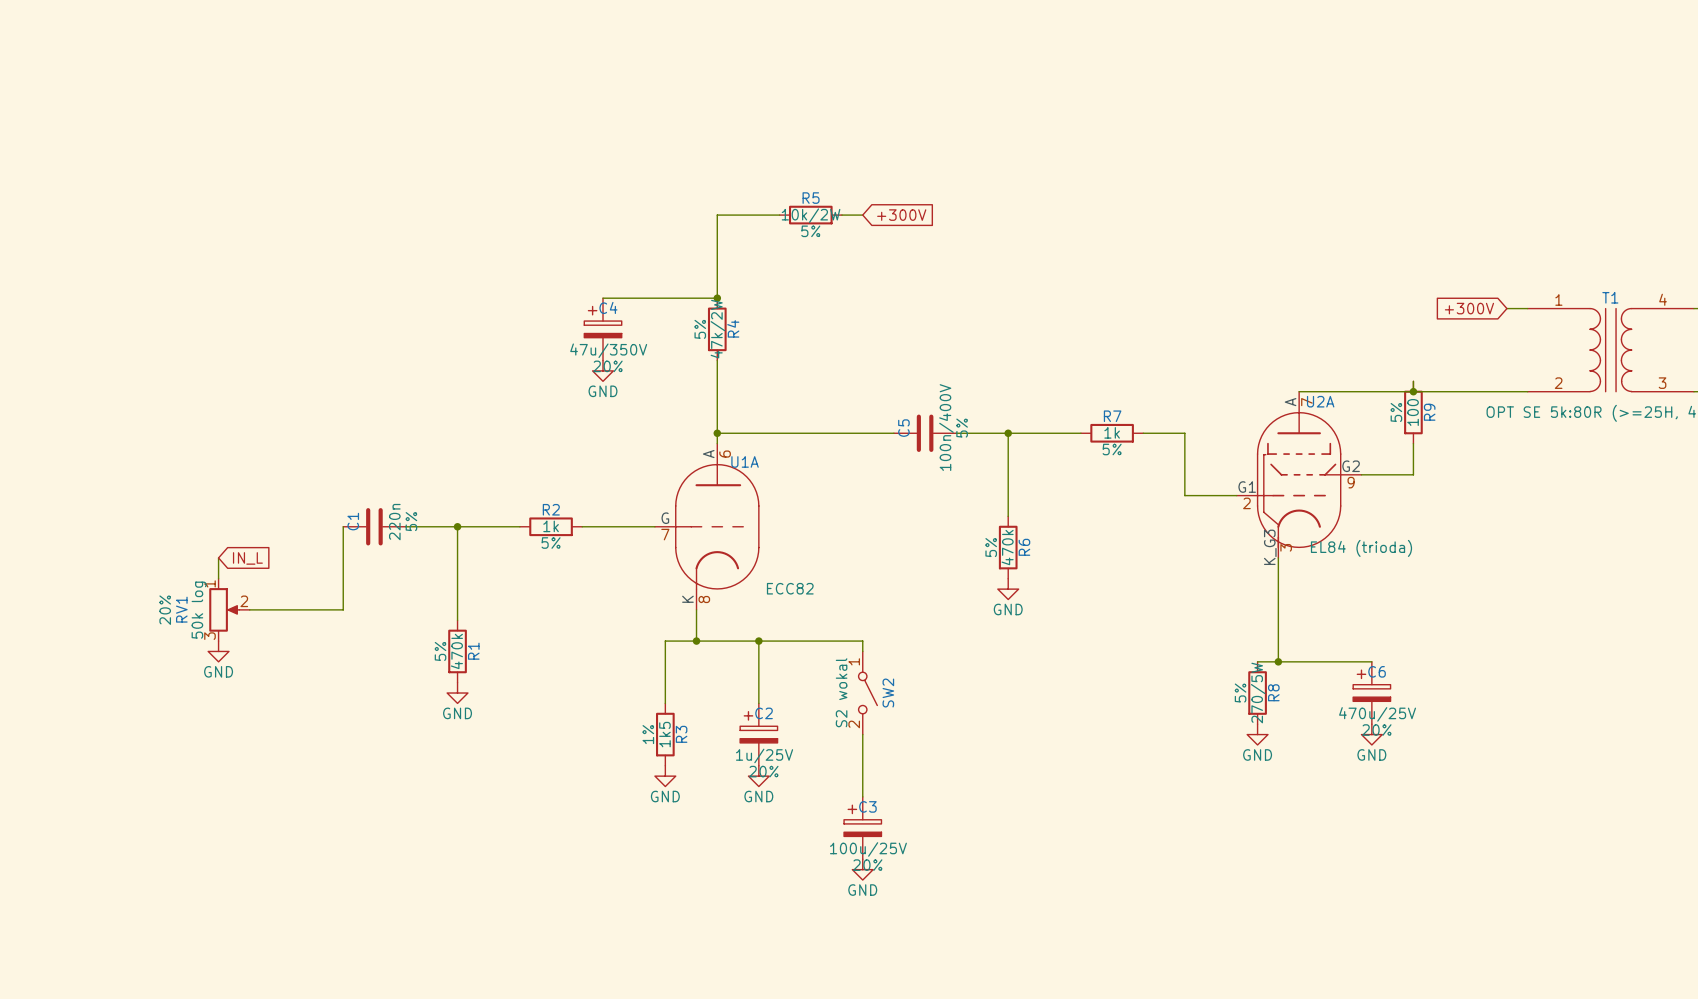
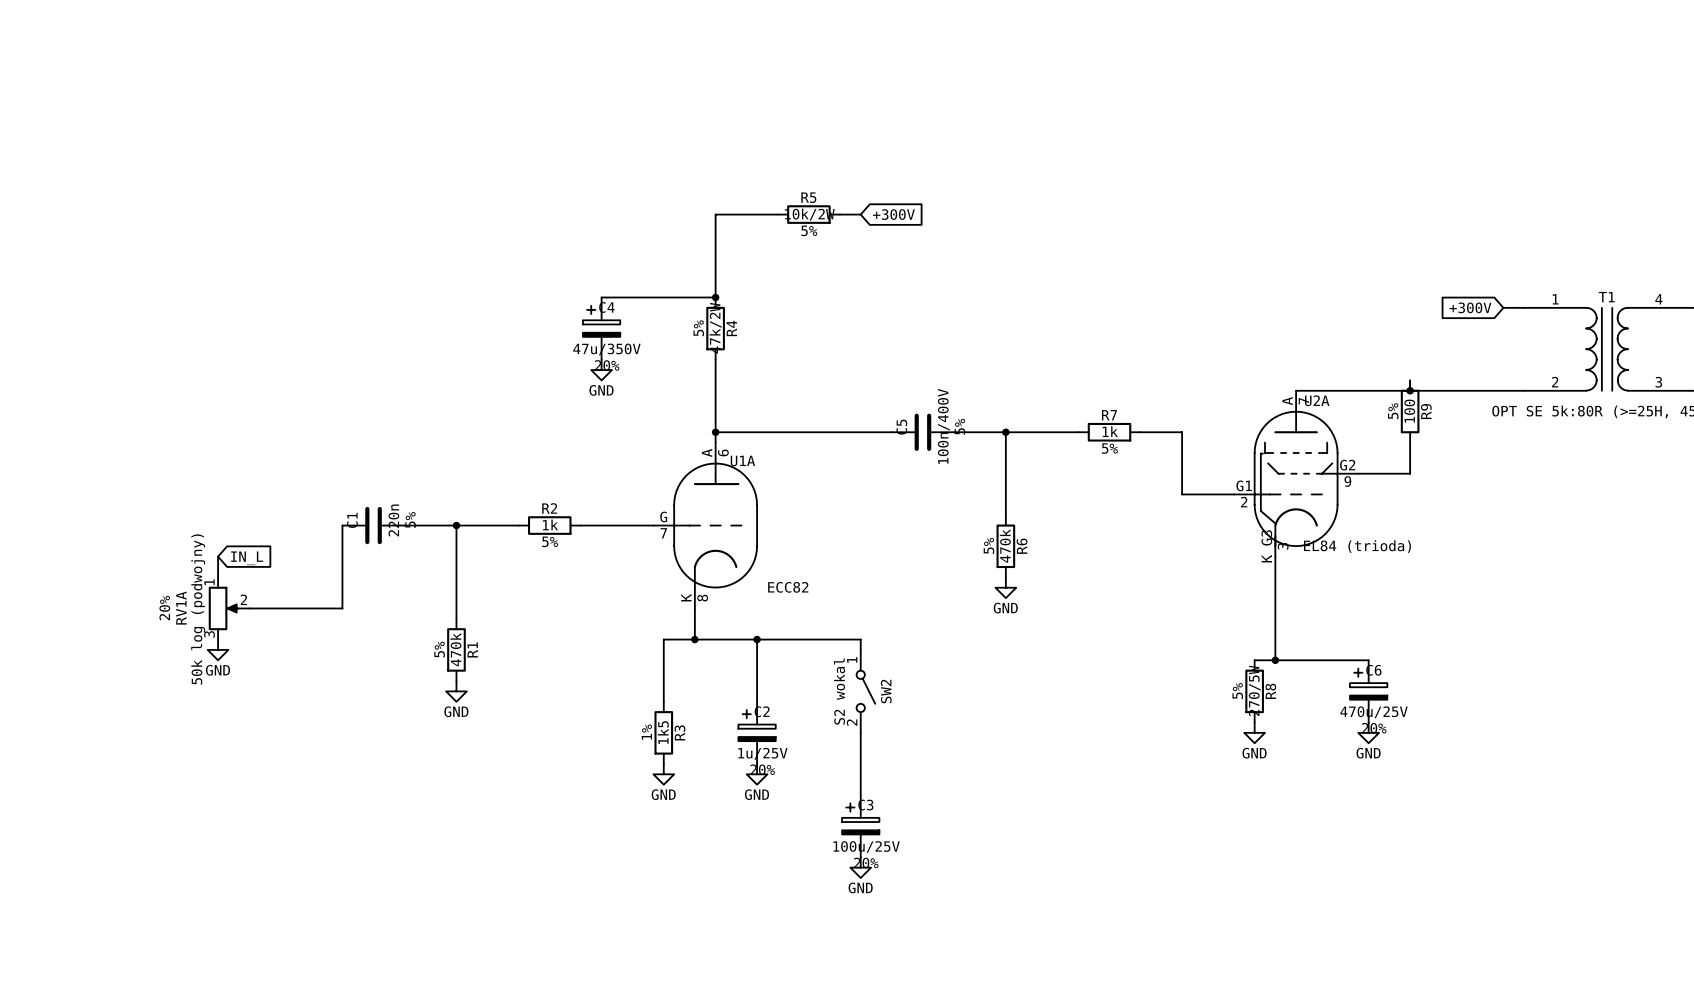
RV1 name: RV1 (181, 609) -> RV1A (181, 608)
RV1 value: 50k log (199, 610) -> 50k log (podwojny) (198, 609)

